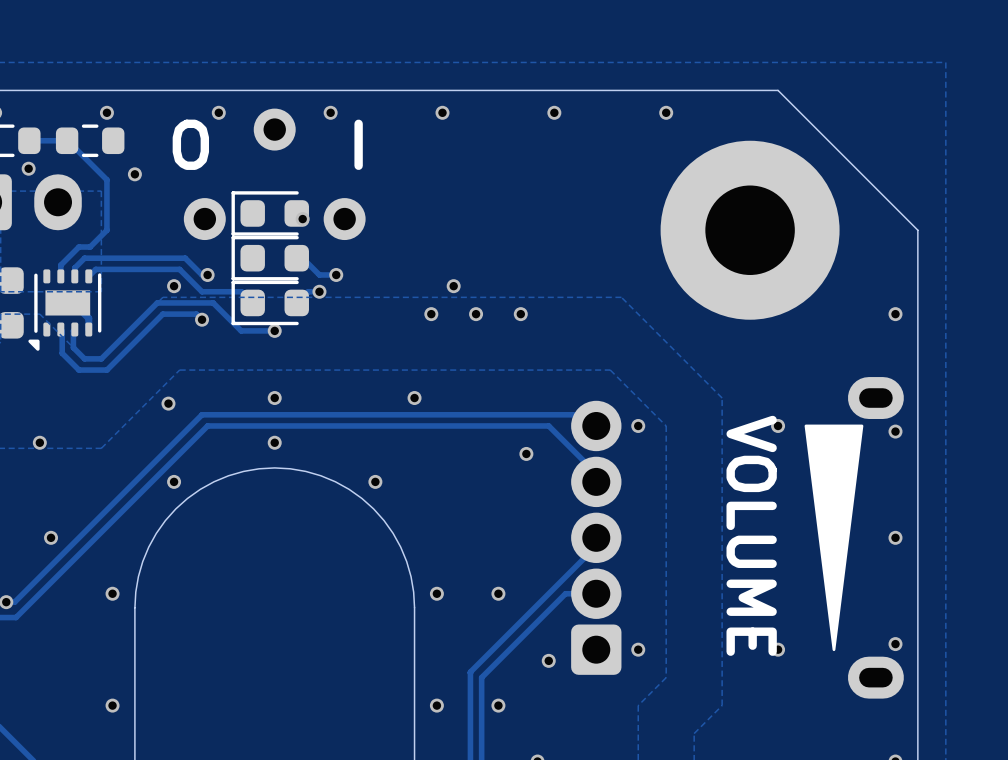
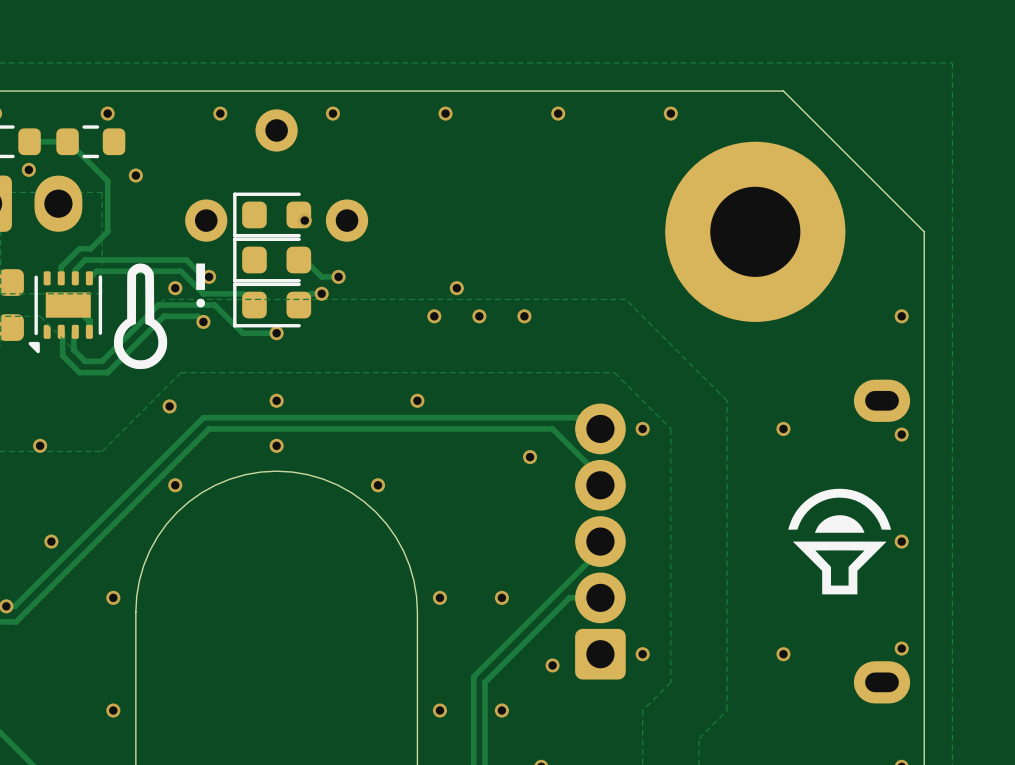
text: O (190, 144) -> none
text: I (358, 144) -> none
drawing: none -> [113, 263, 205, 370]
drawing shape: [804, 424, 864, 652] -> [788, 488, 891, 595]
text: VOLUME (751, 535) -> none

